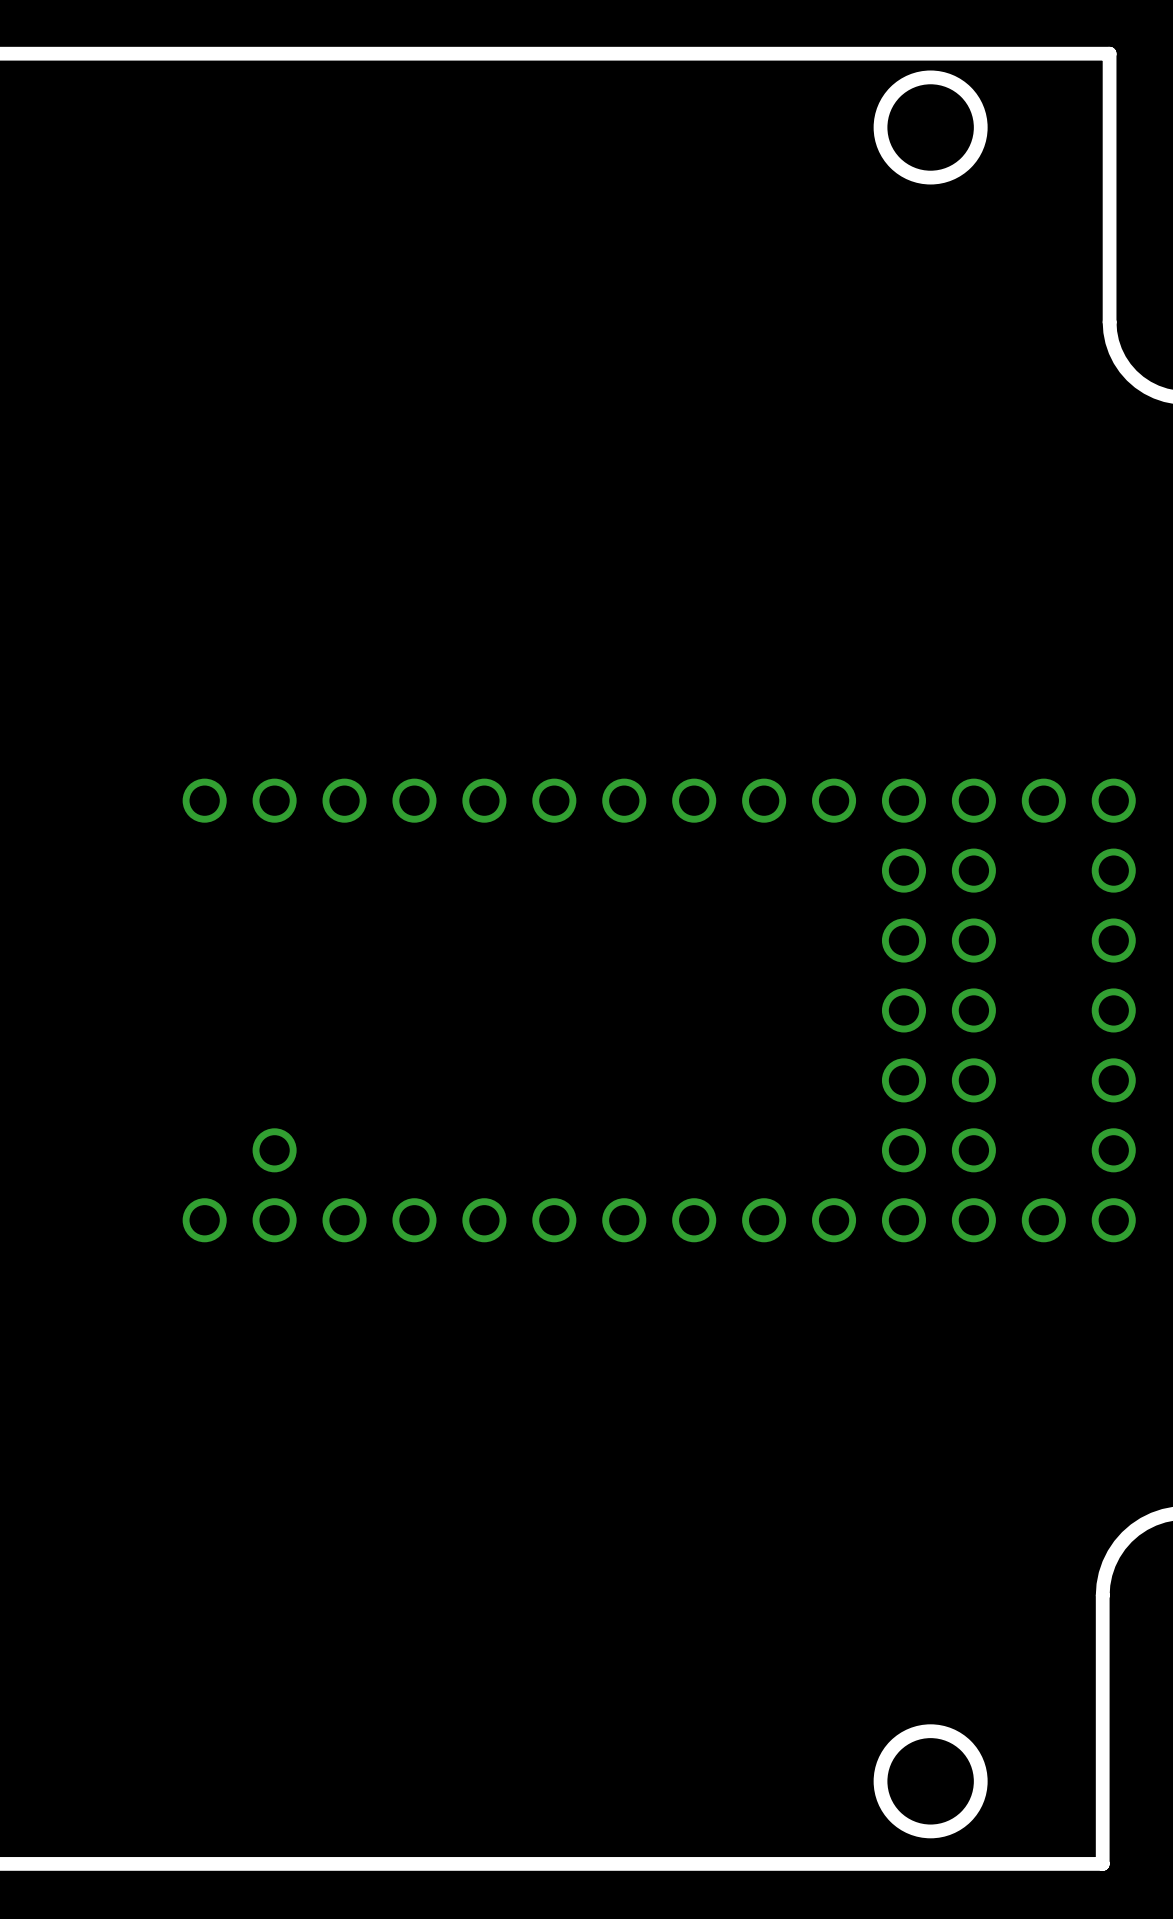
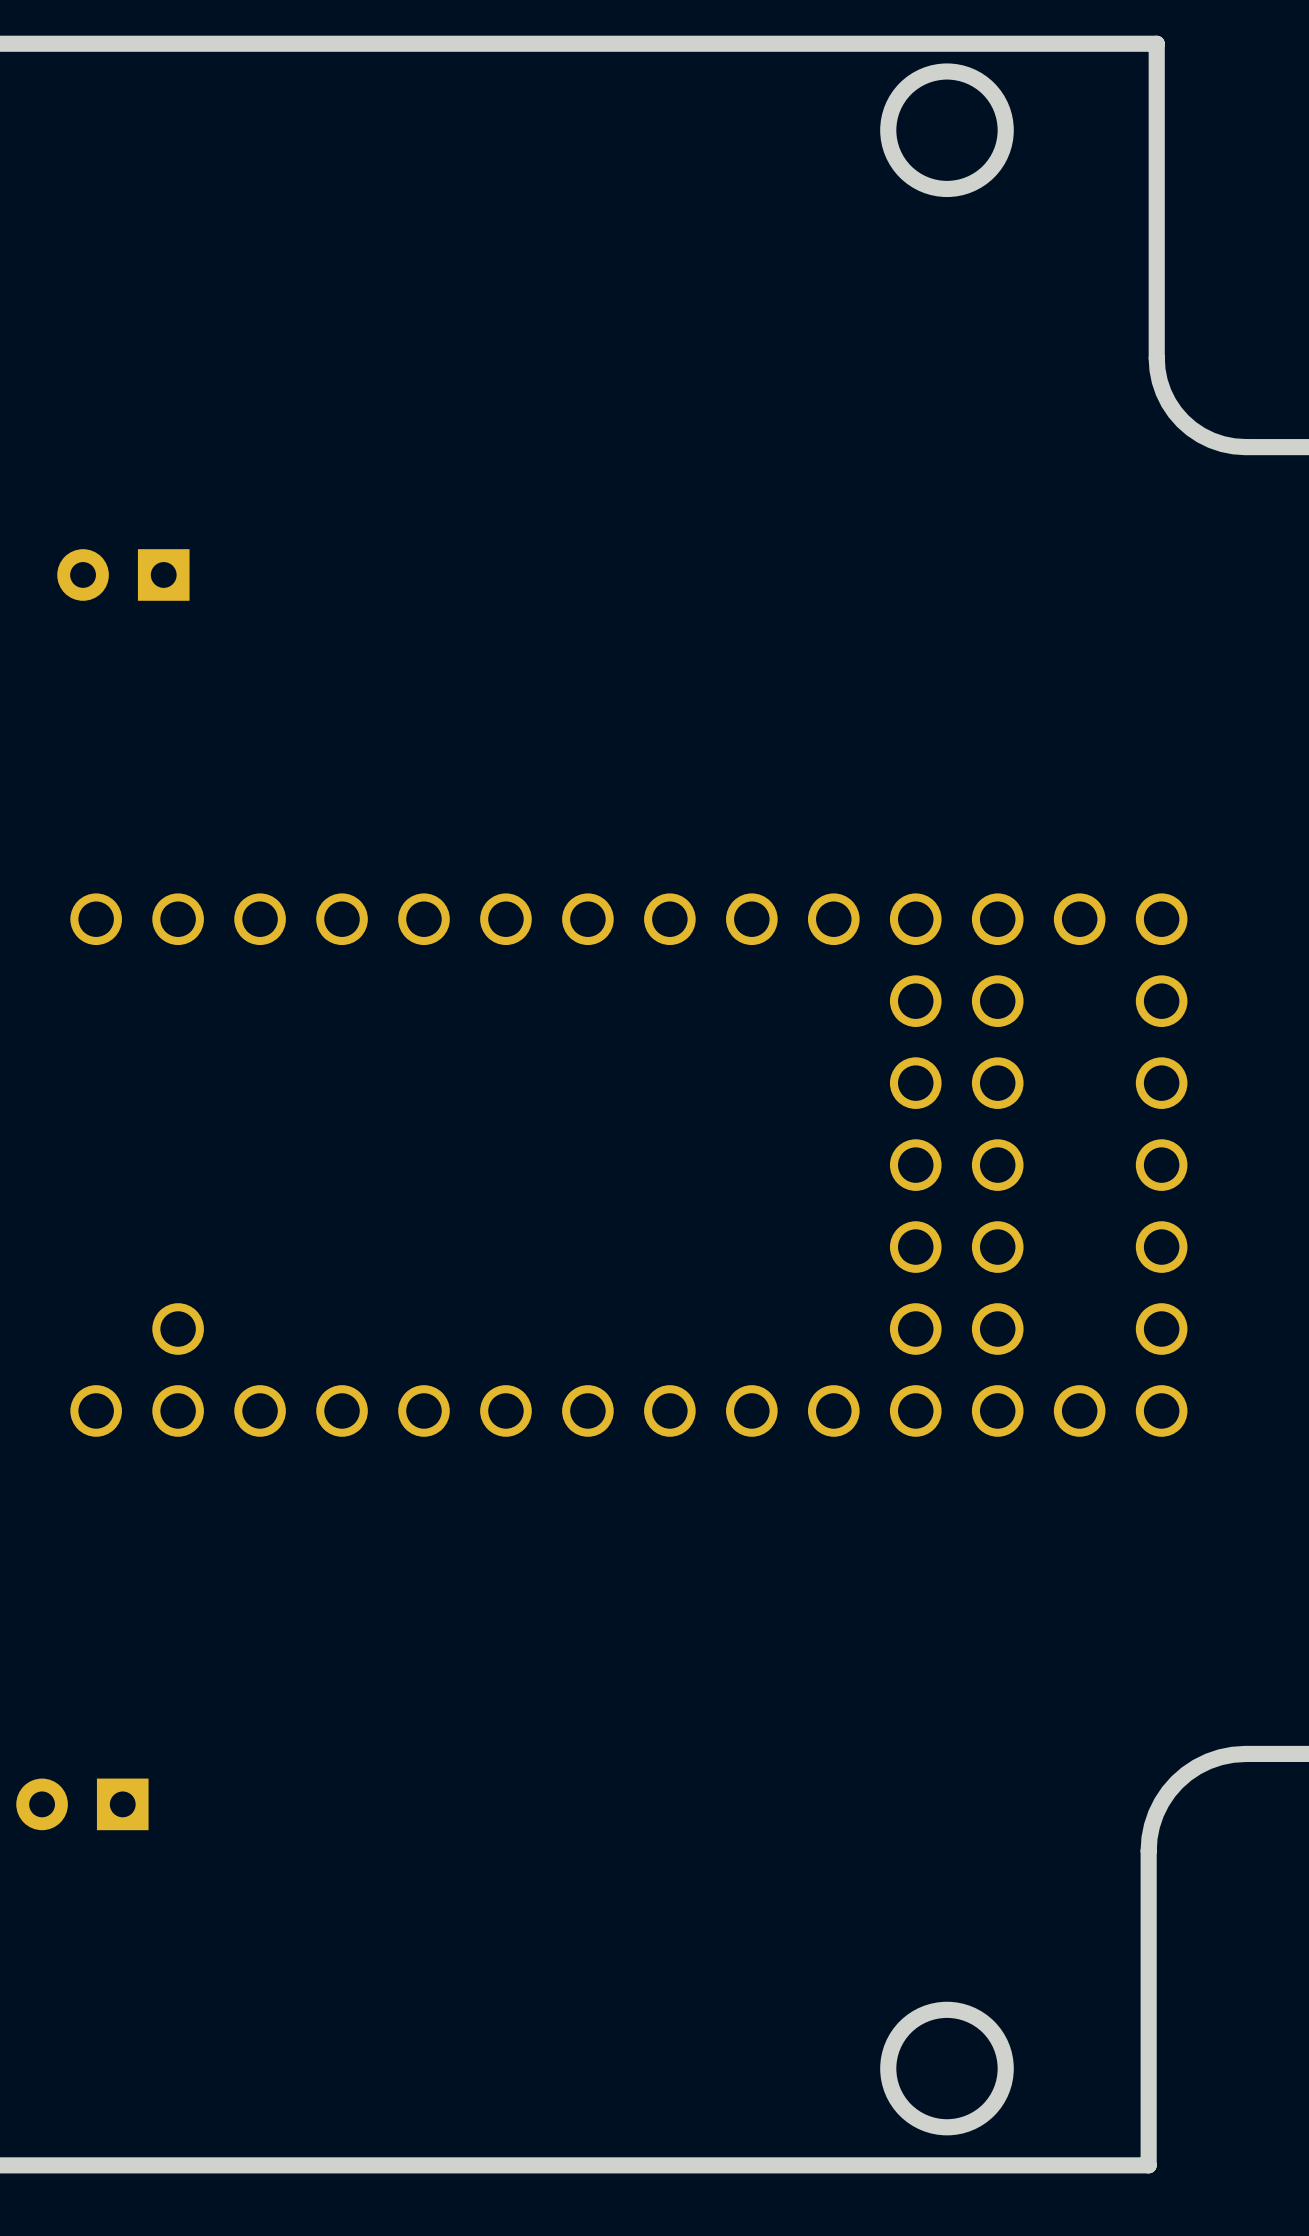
part: none -> (123, 574)
part: none -> (82, 1804)

